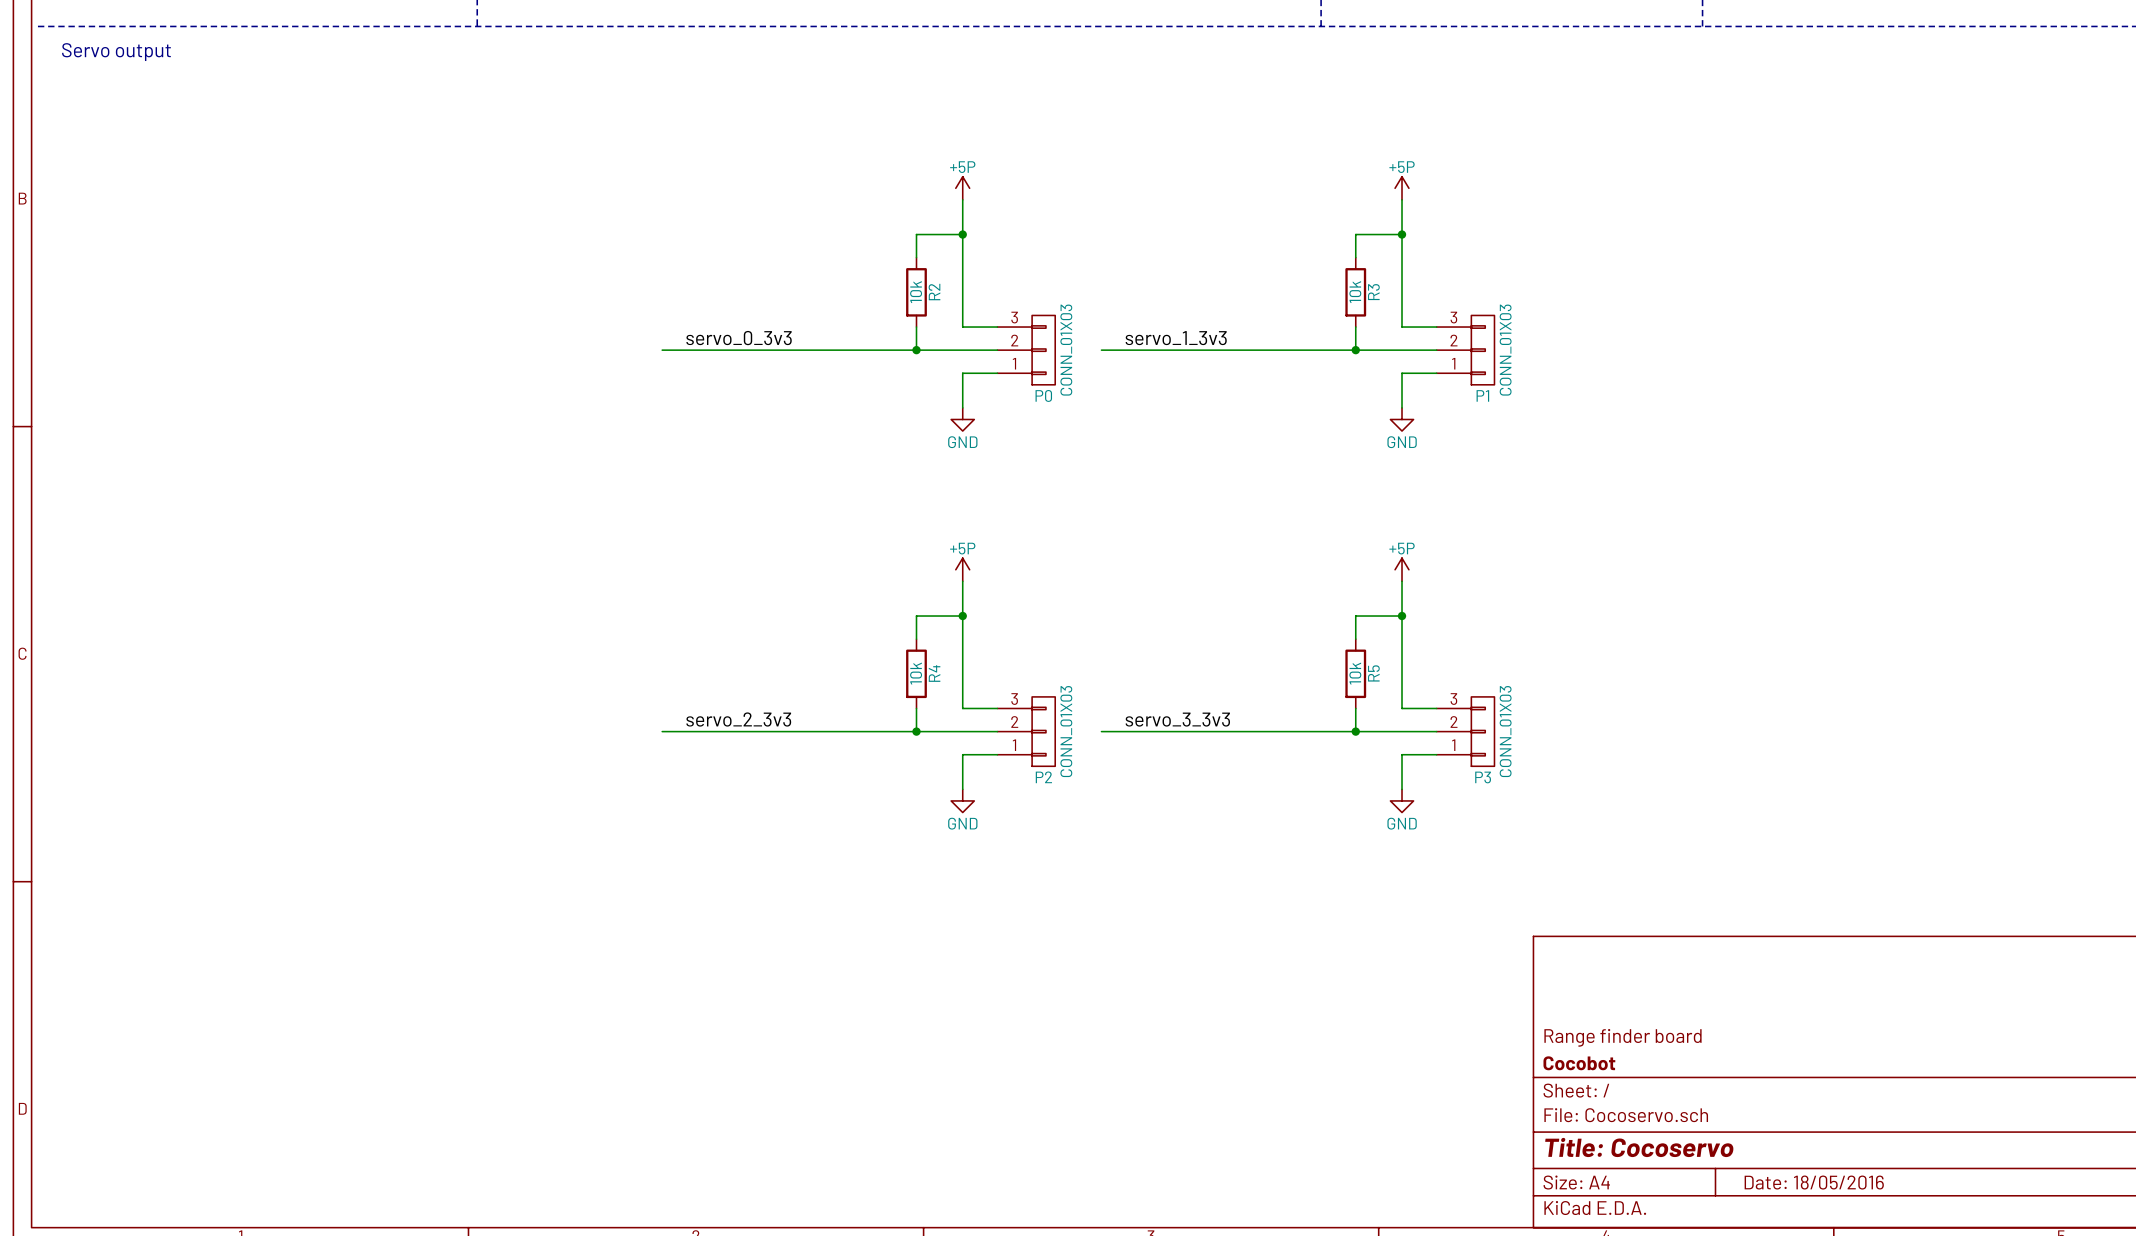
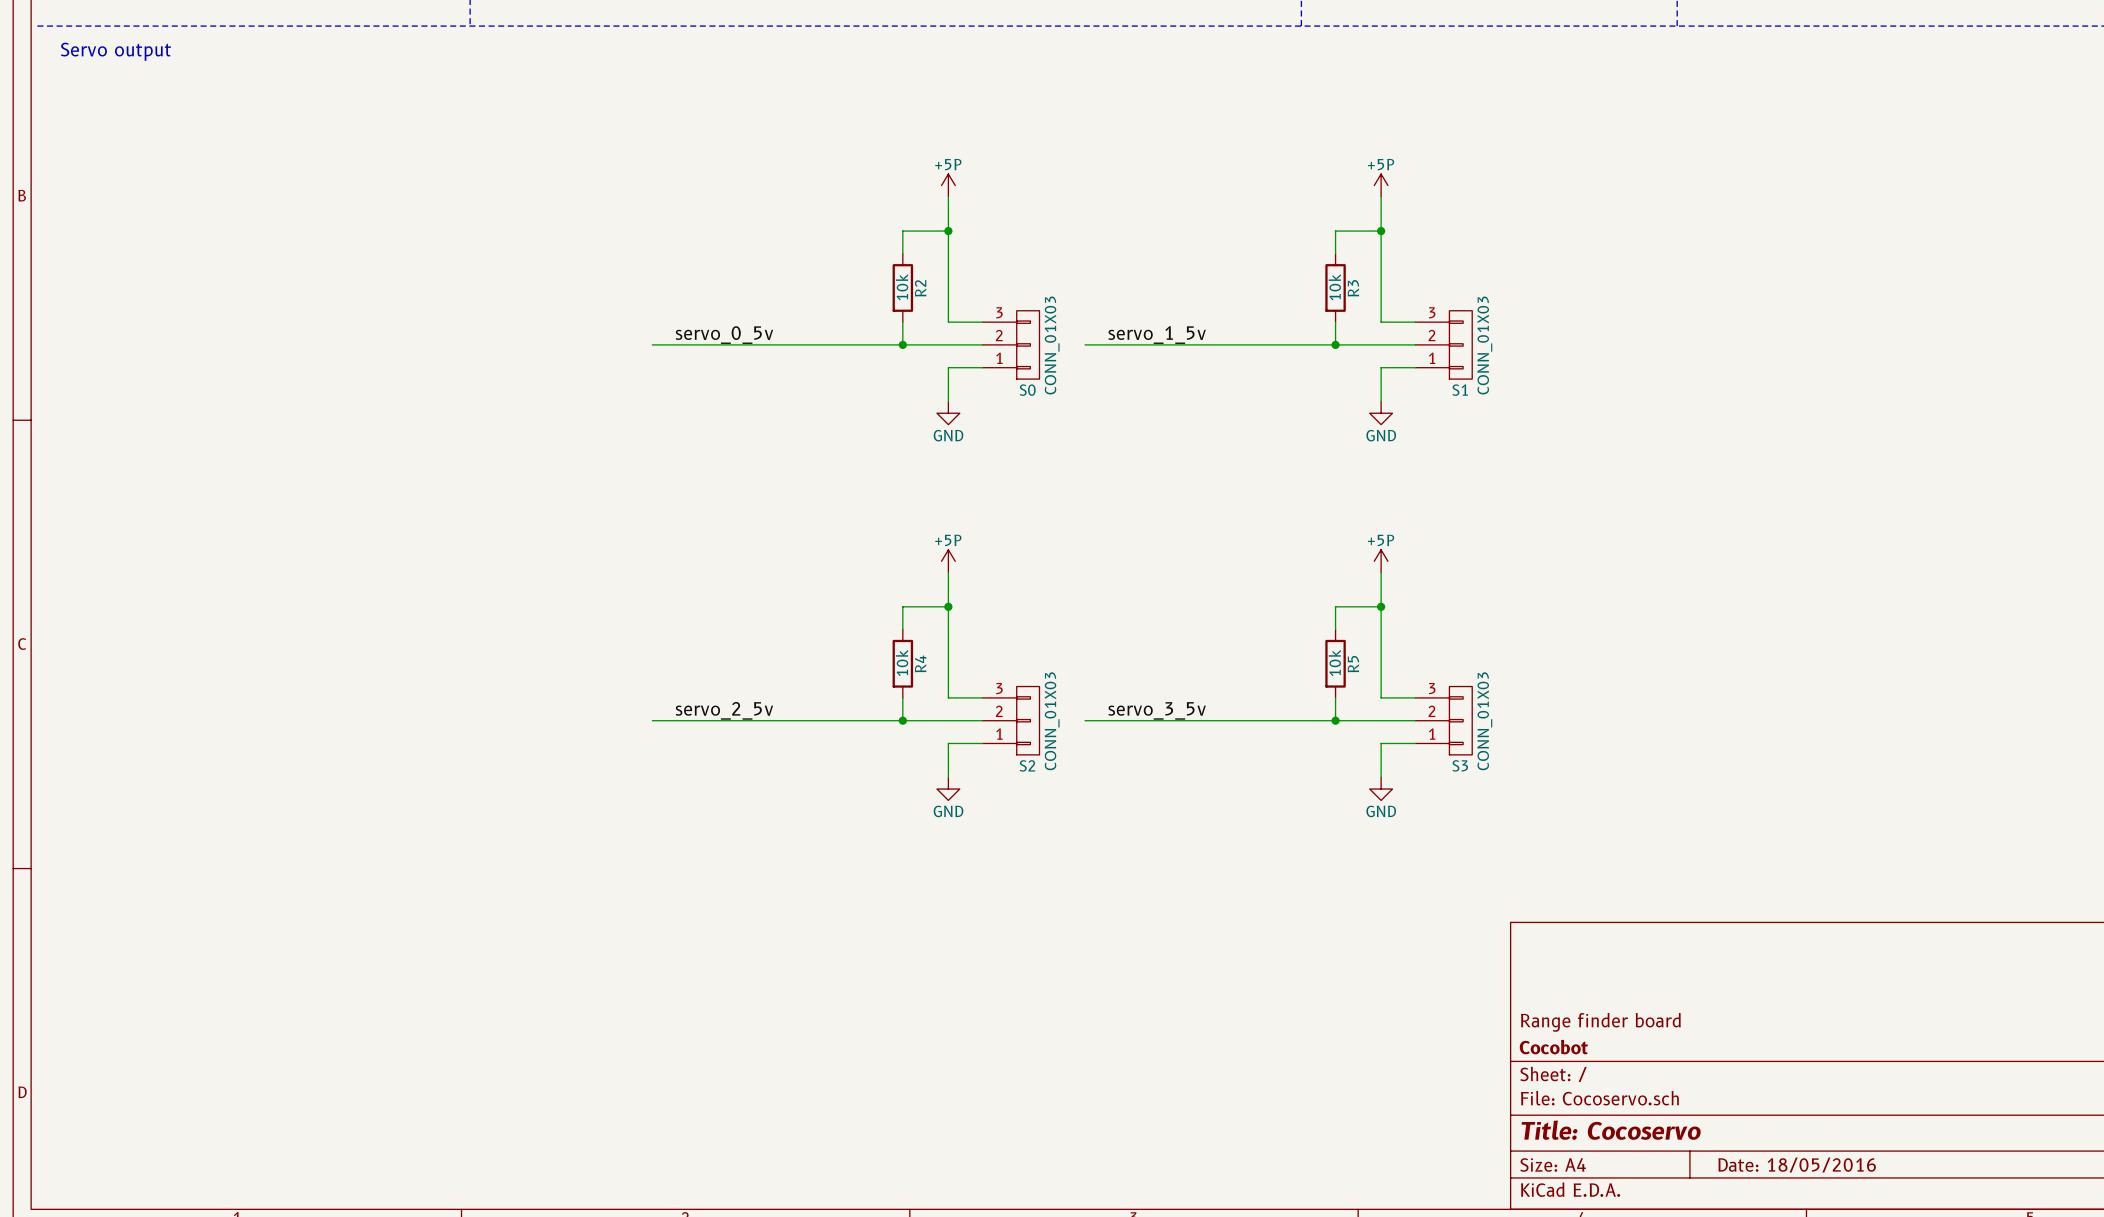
label: servo_0_3v3 (739, 338) -> servo_0_5v (724, 335)
label: servo_1_3v3 (1176, 338) -> servo_1_5v (1157, 335)
P0 name: P0 (1043, 395) -> S0 (1027, 390)
P1 name: P1 (1482, 395) -> S1 (1460, 390)
label: servo_2_3v3 (738, 719) -> servo_2_5v (724, 710)
label: servo_3_3v3 (1177, 719) -> servo_3_5v (1157, 710)
P2 name: P2 (1043, 777) -> S2 (1027, 765)
P3 name: P3 (1483, 777) -> S3 (1460, 765)

